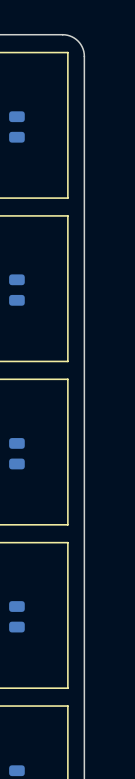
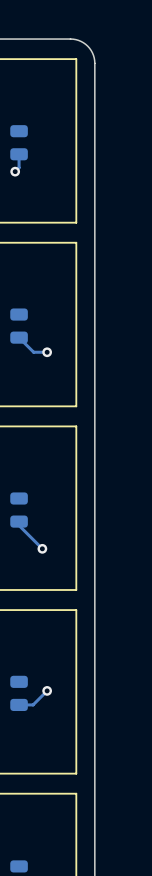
bottom track: none -> (19, 154) (19, 167) (15, 171)
via: none -> (15, 171)
bottom track: none -> (19, 337) (33, 352) (47, 352)
via: none -> (47, 352)
bottom track: none -> (19, 521) (19, 525) (42, 548)
via: none -> (42, 548)
bottom track: none -> (47, 690) (33, 704) (19, 704)
via: none -> (47, 690)

